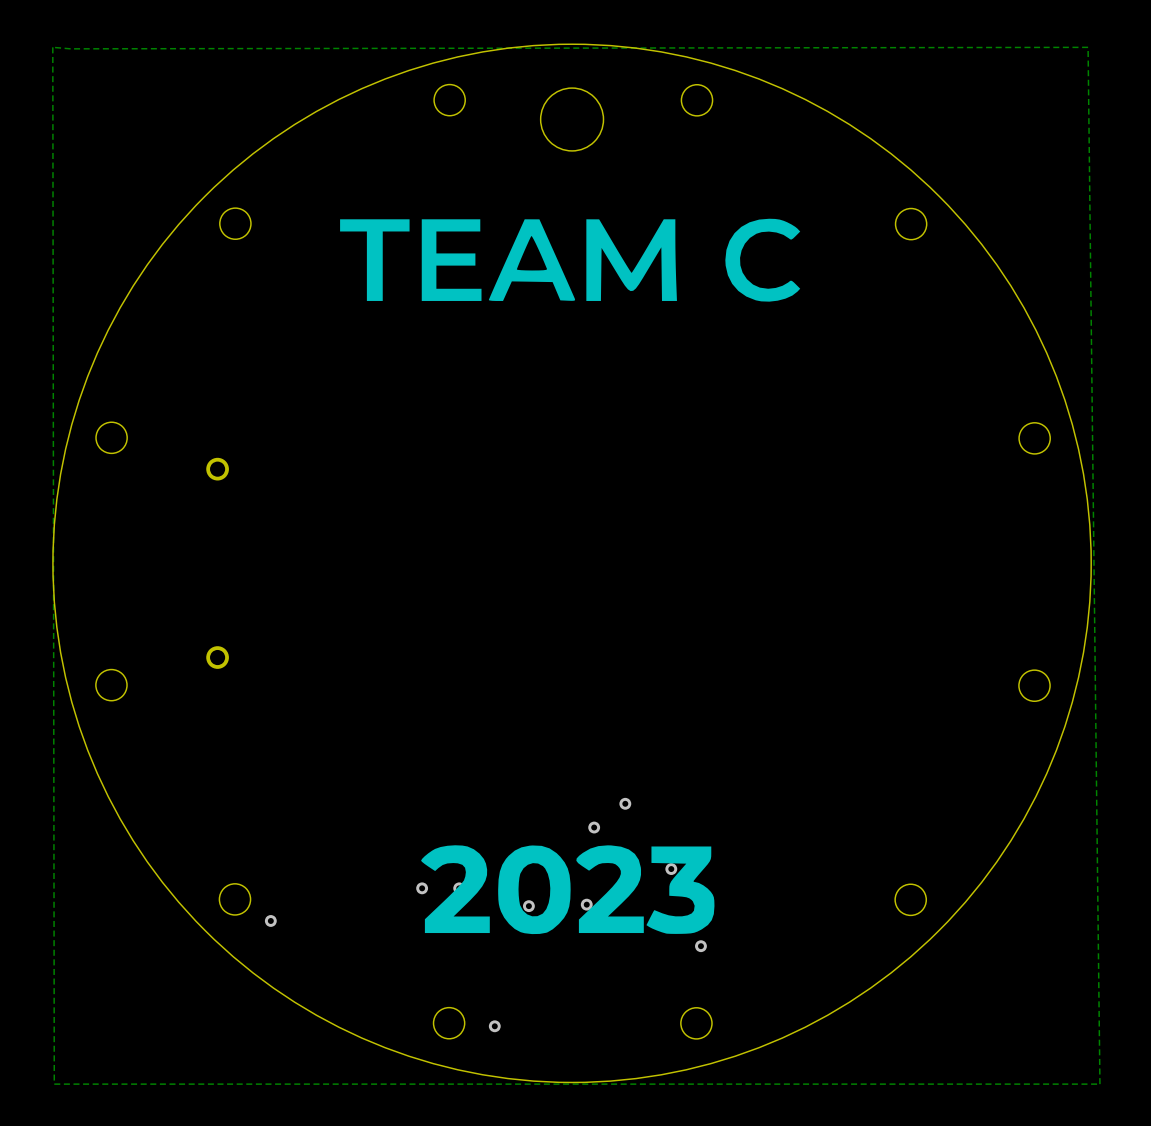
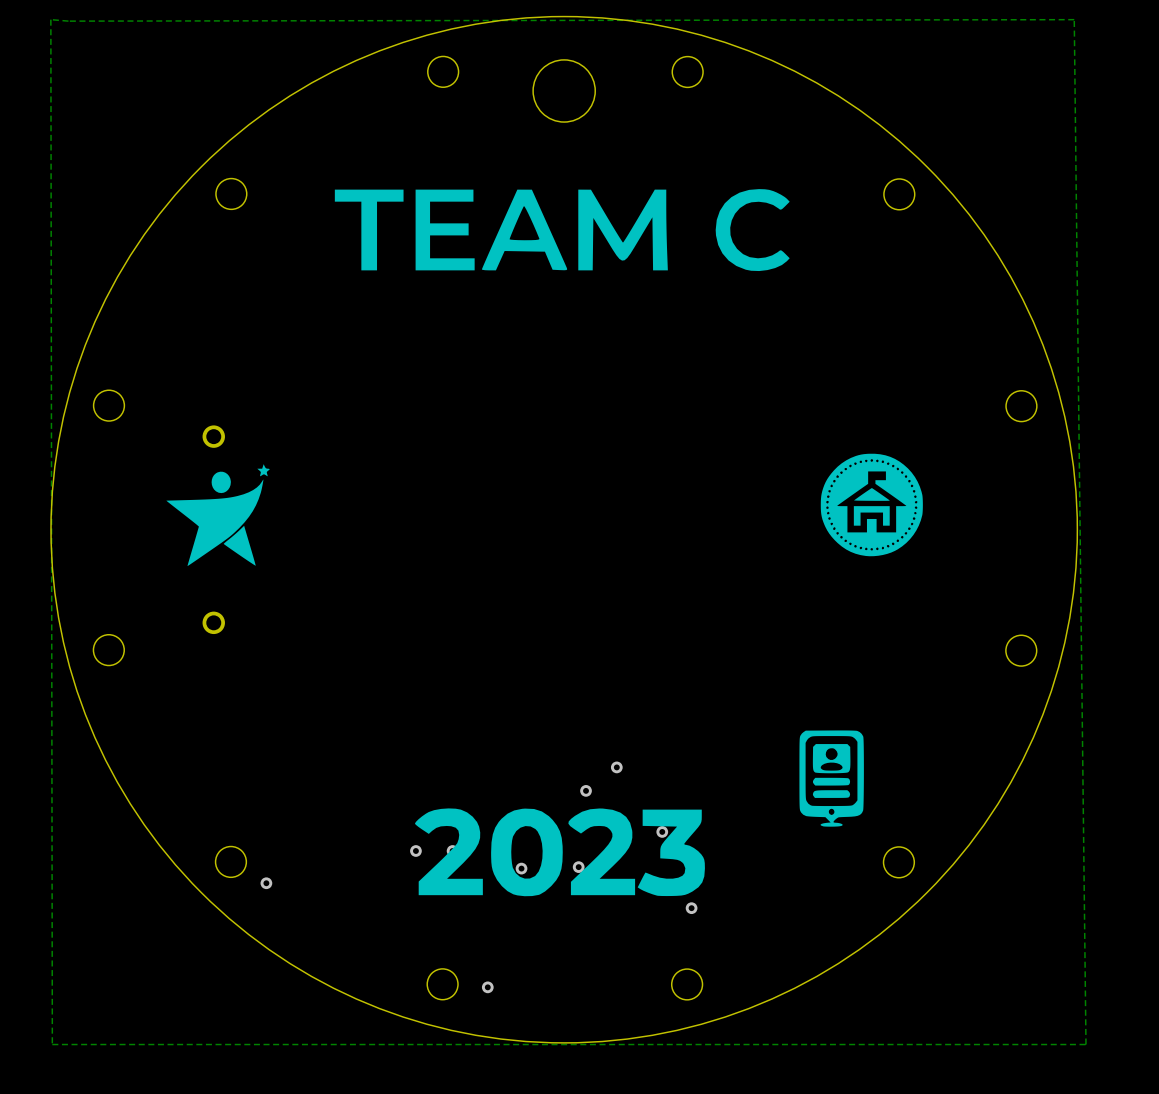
drawing: none -> [820, 453, 923, 557]
drawing: none -> [166, 464, 270, 566]
drawing: none -> [799, 730, 864, 827]

